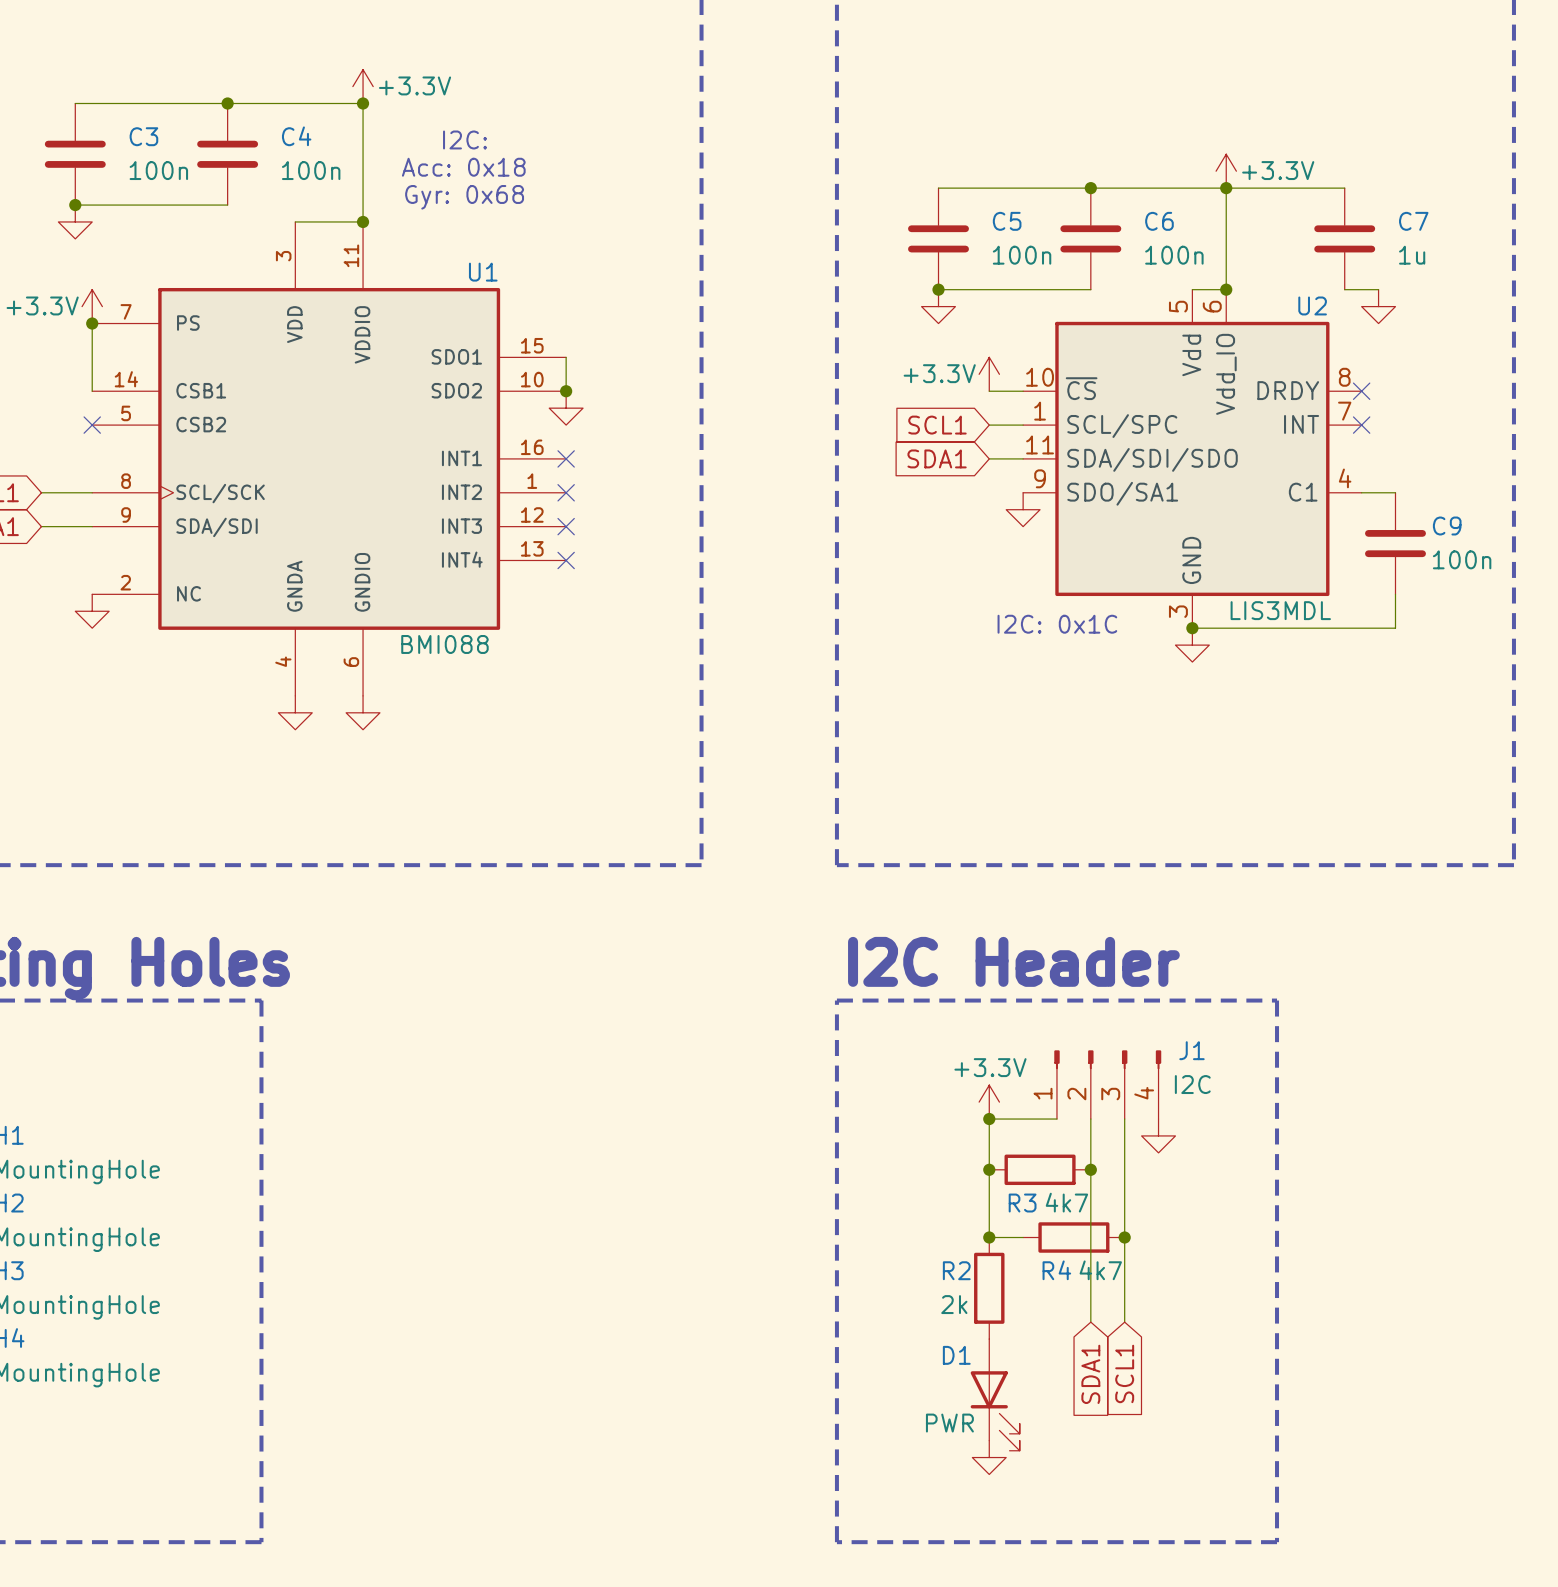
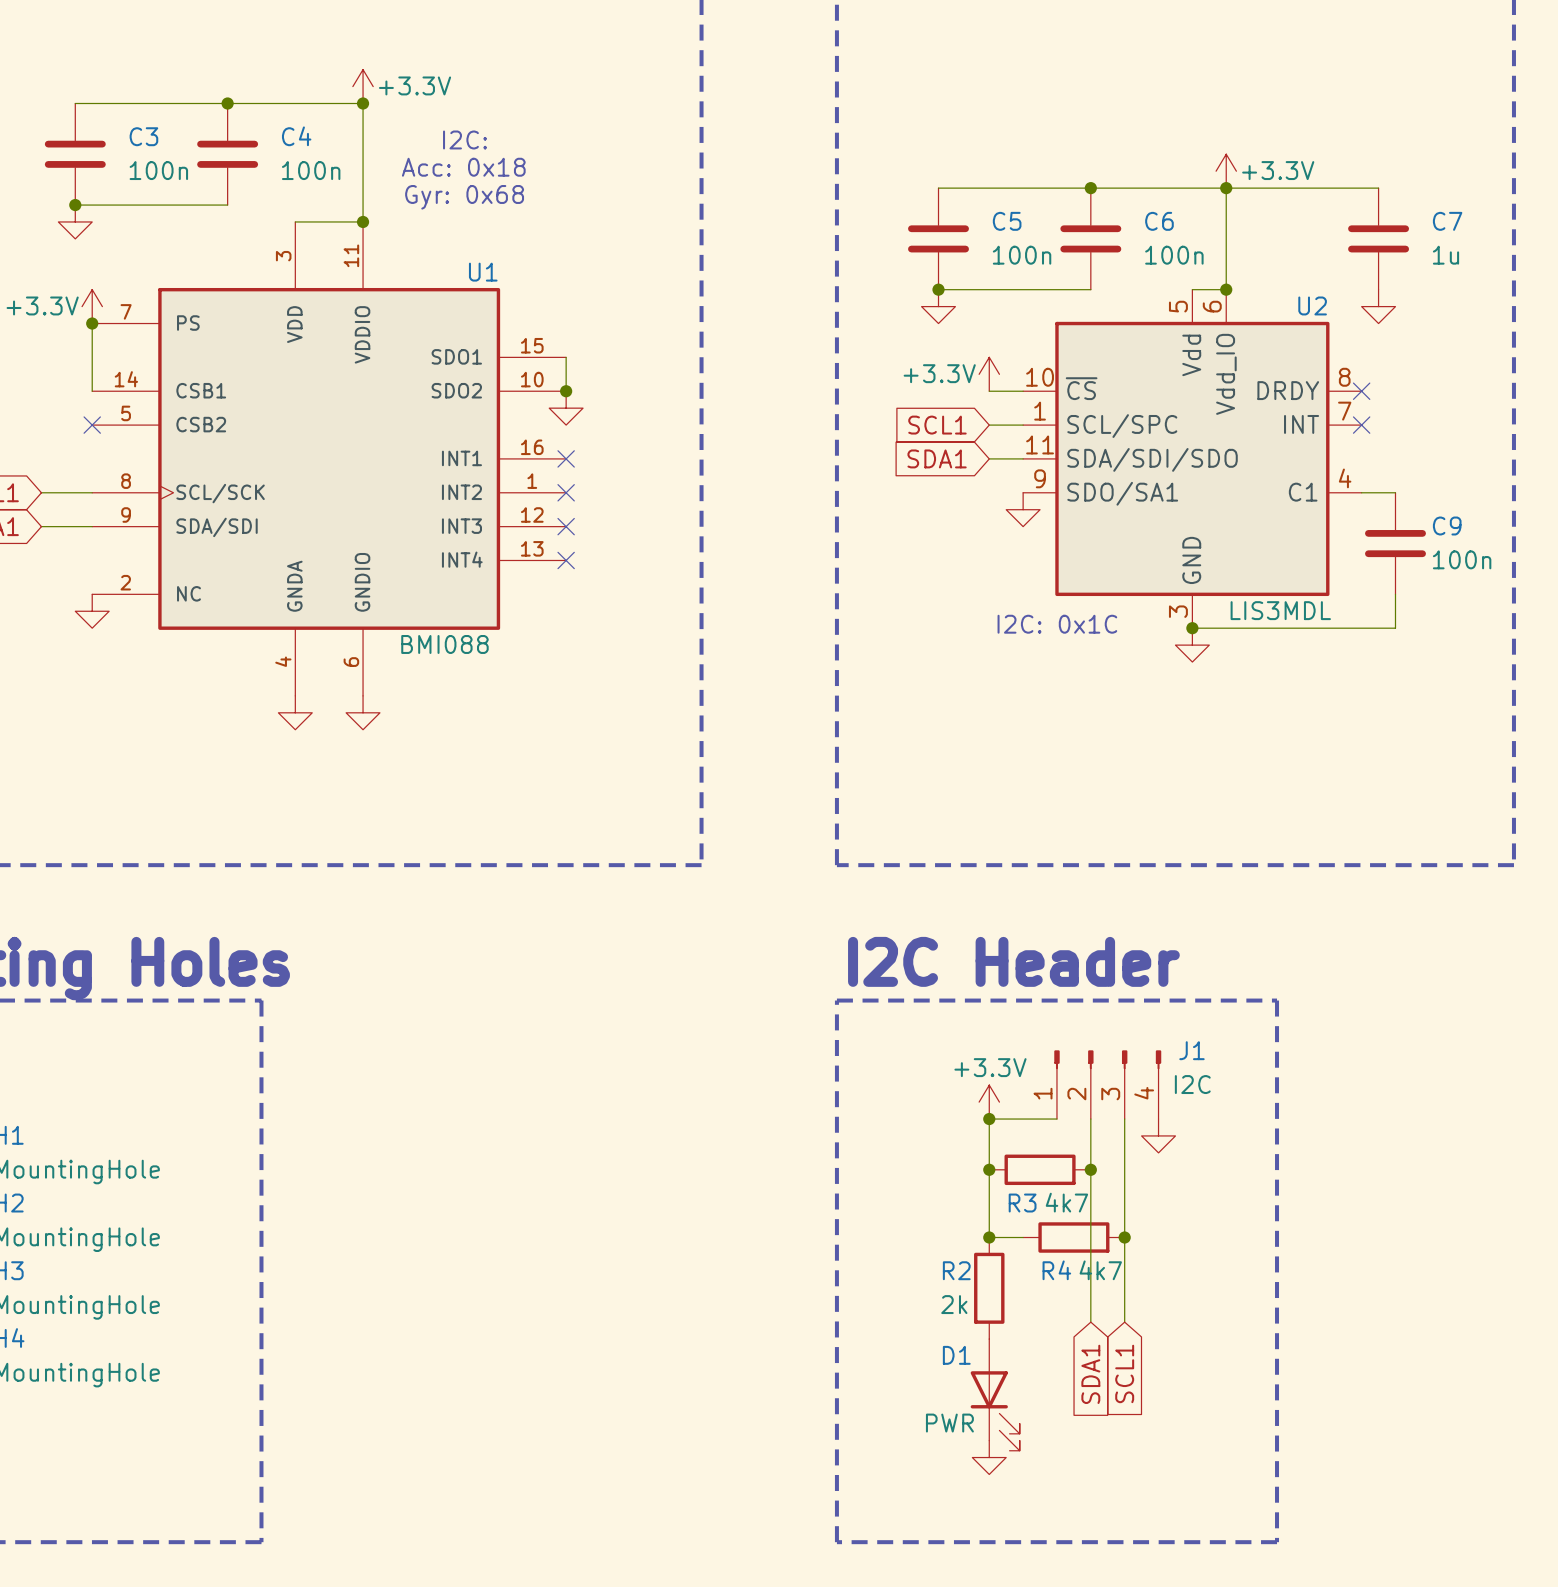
C7 position: (1344, 238) -> (1378, 238)
wire: (1344, 289) (1378, 289) -> (1344, 188) (1378, 188)

